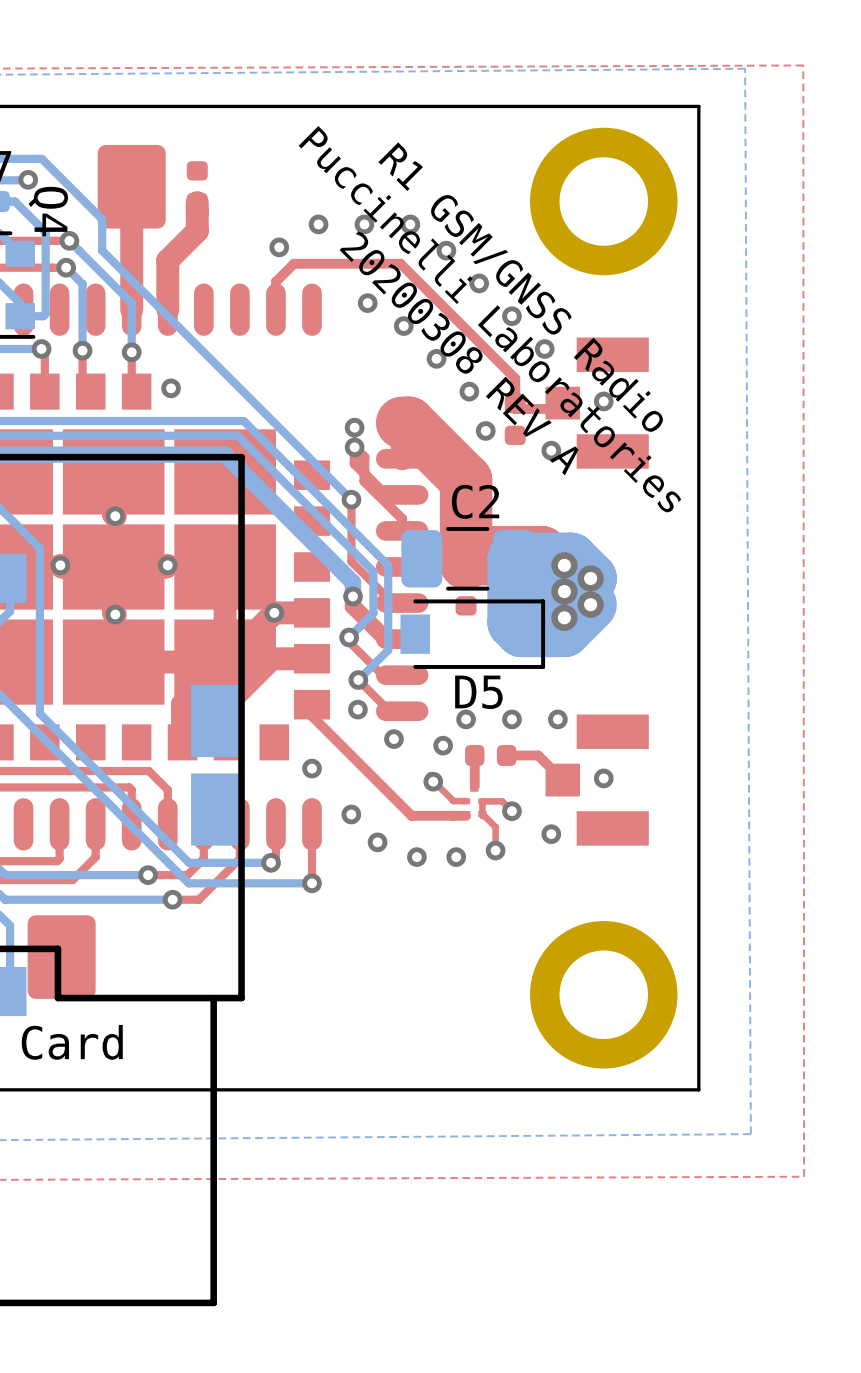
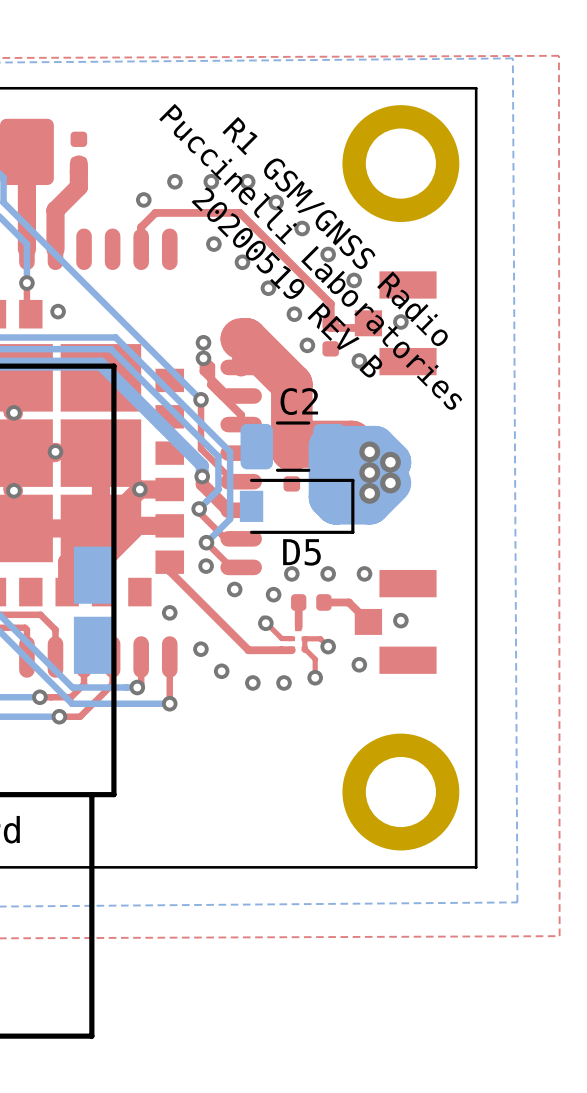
text: 20200308 REV A (459, 353) -> 20200519 REV B (287, 282)

